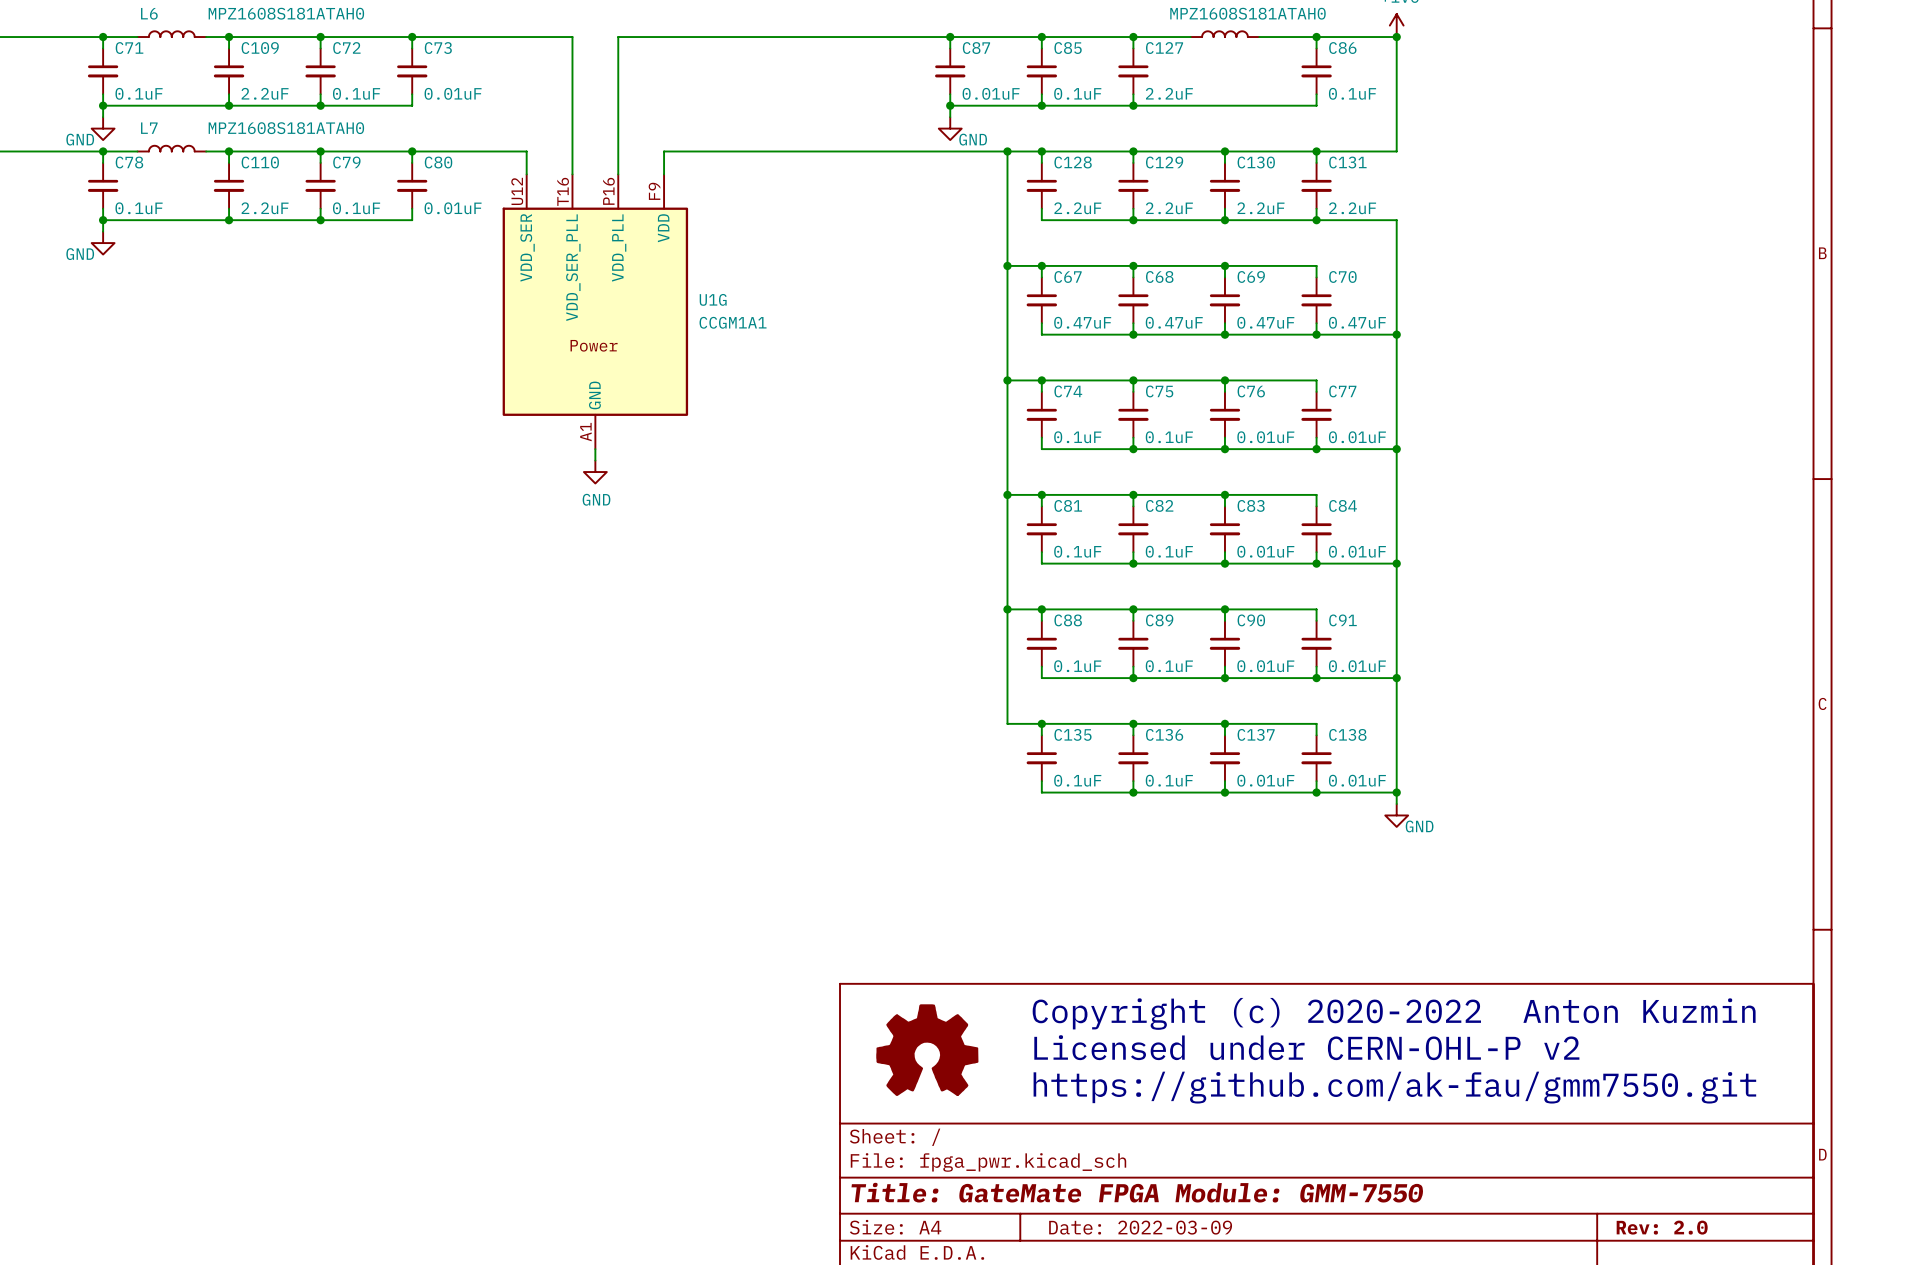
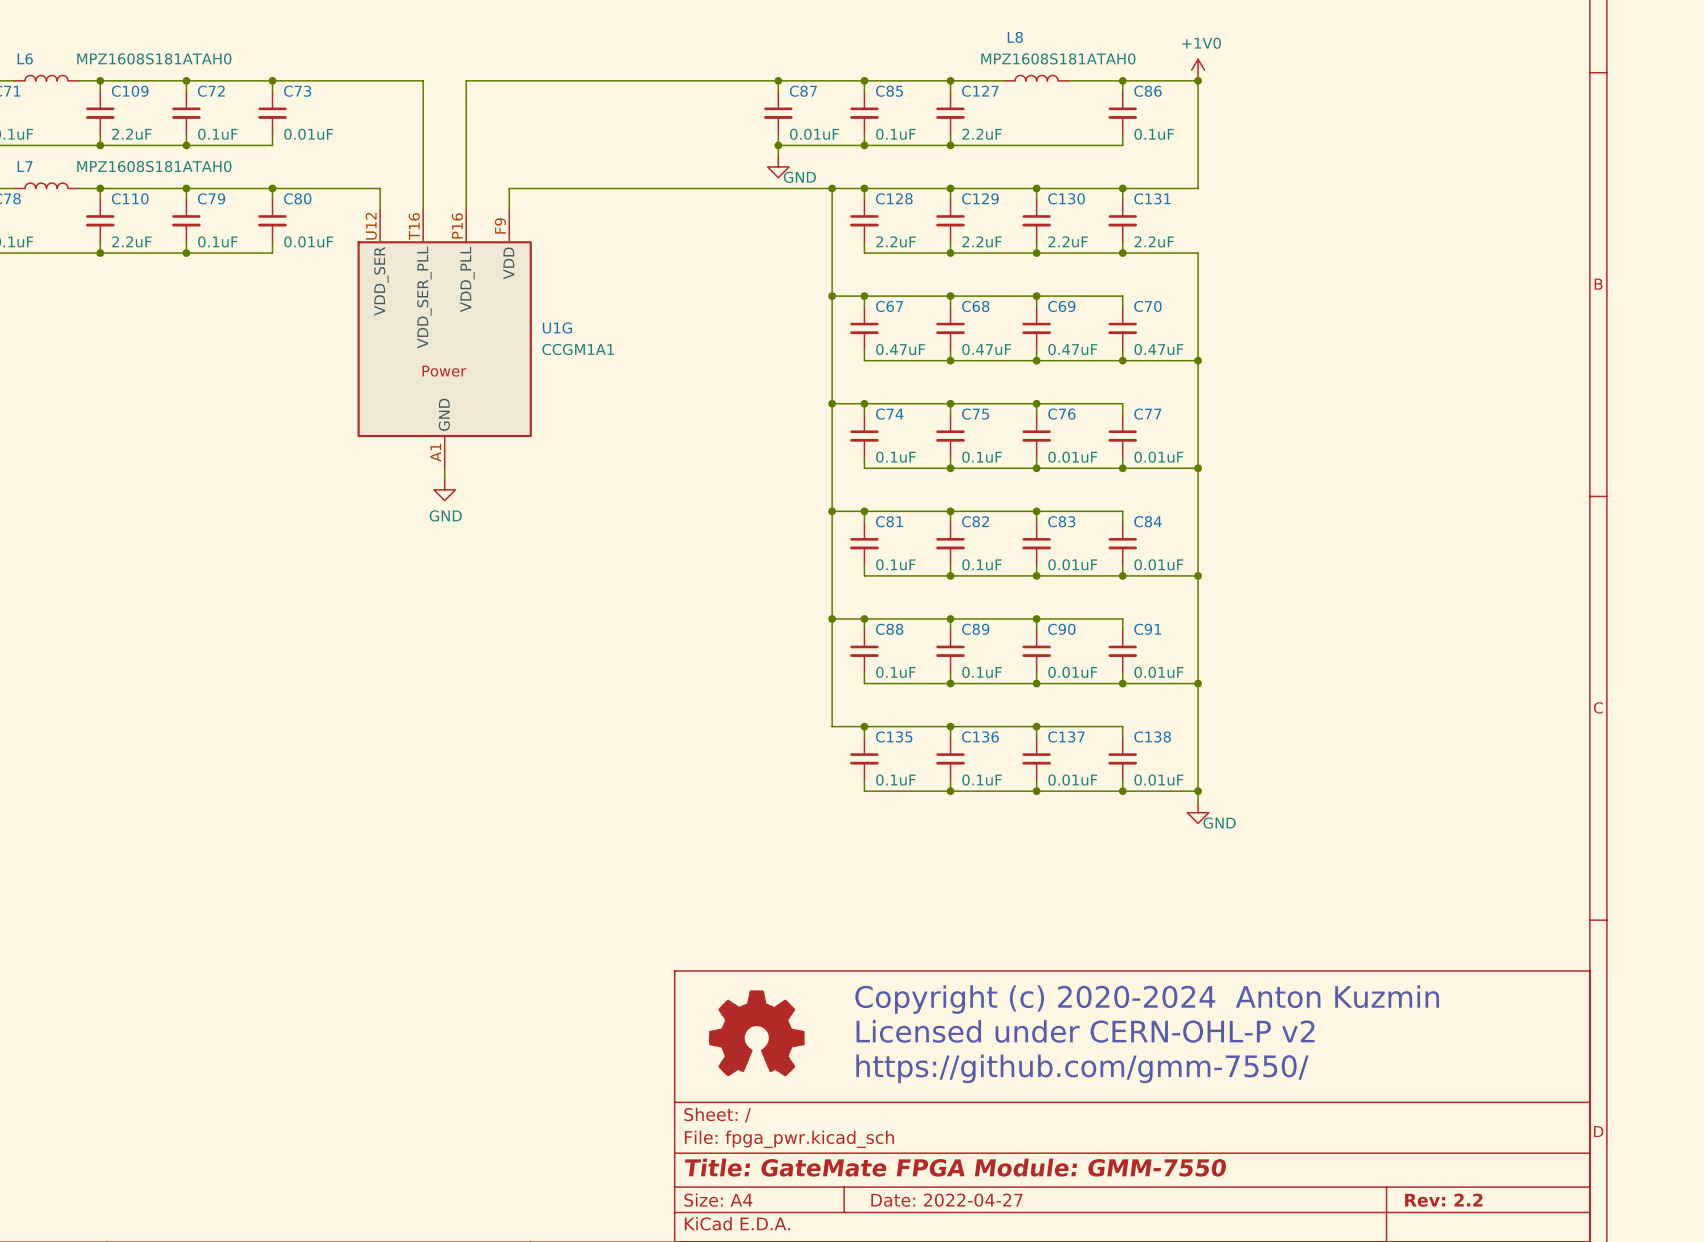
text: Copyright (c) 2020-2022 Anton Kuzmin (1394, 1013) -> Copyright (c) 2020-2024 Anton Kuzmin (1147, 999)
text: https://github.com/ak-fau/gmm7550.git (1394, 1087) -> https://github.com/gmm-7550/ (1082, 1068)
title block: Date: 2022-03-09 (1140, 1227) -> Date: 2022-04-27 (946, 1200)
title block: Rev: 2.0 (1662, 1227) -> Rev: 2.2 (1443, 1200)

